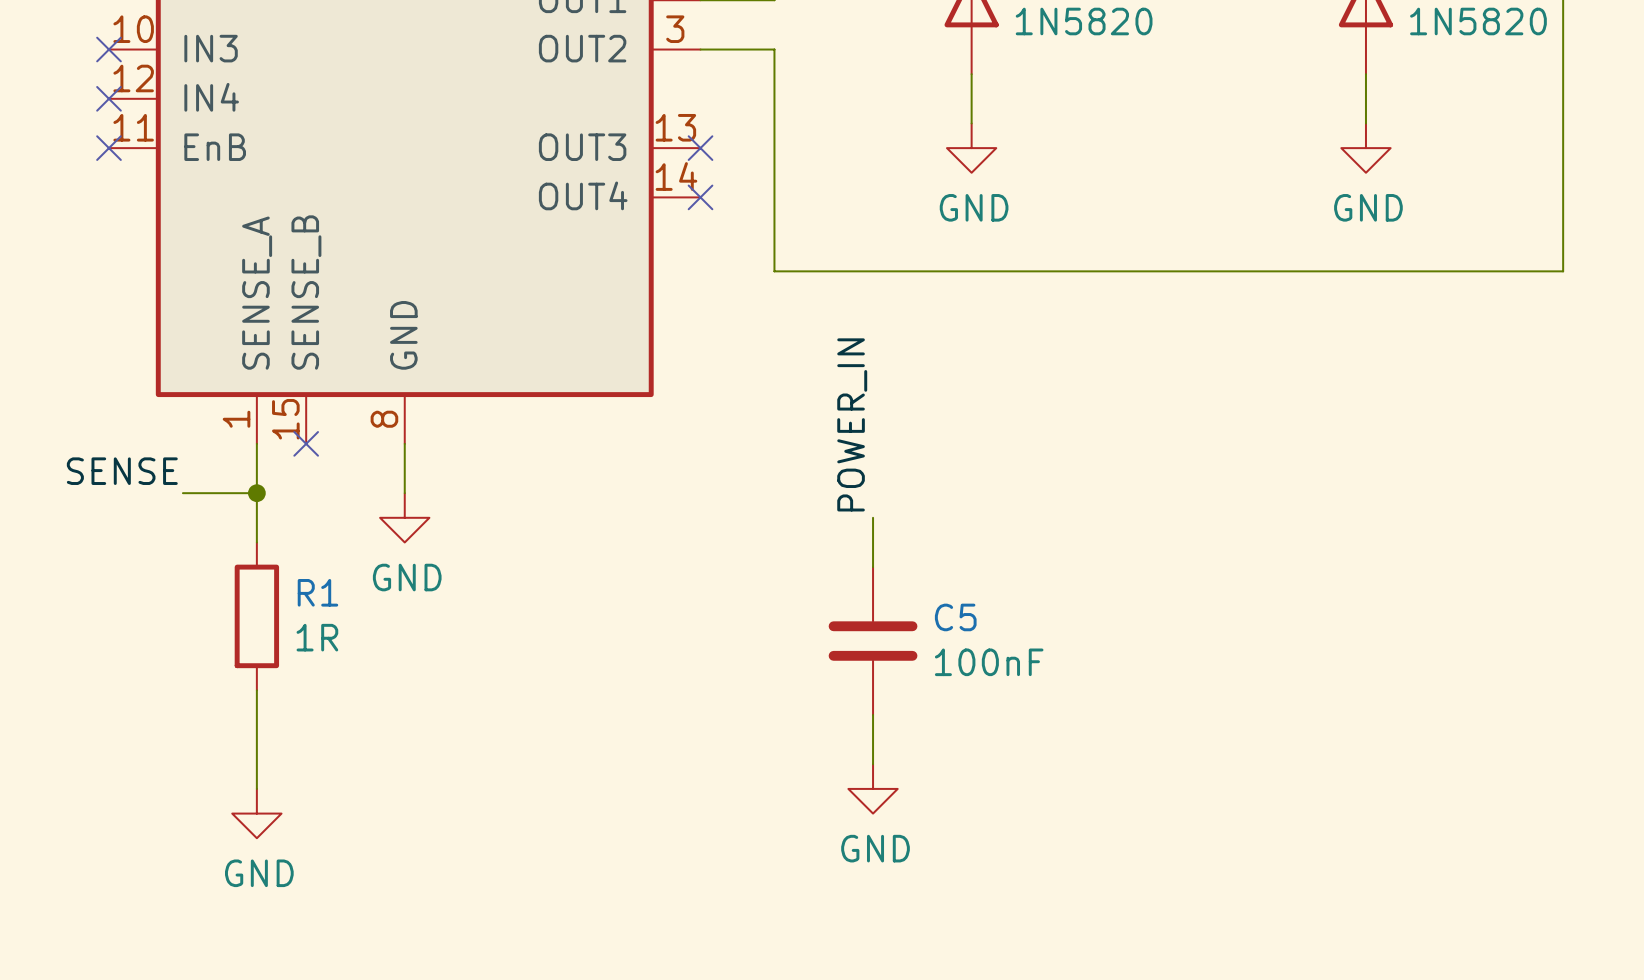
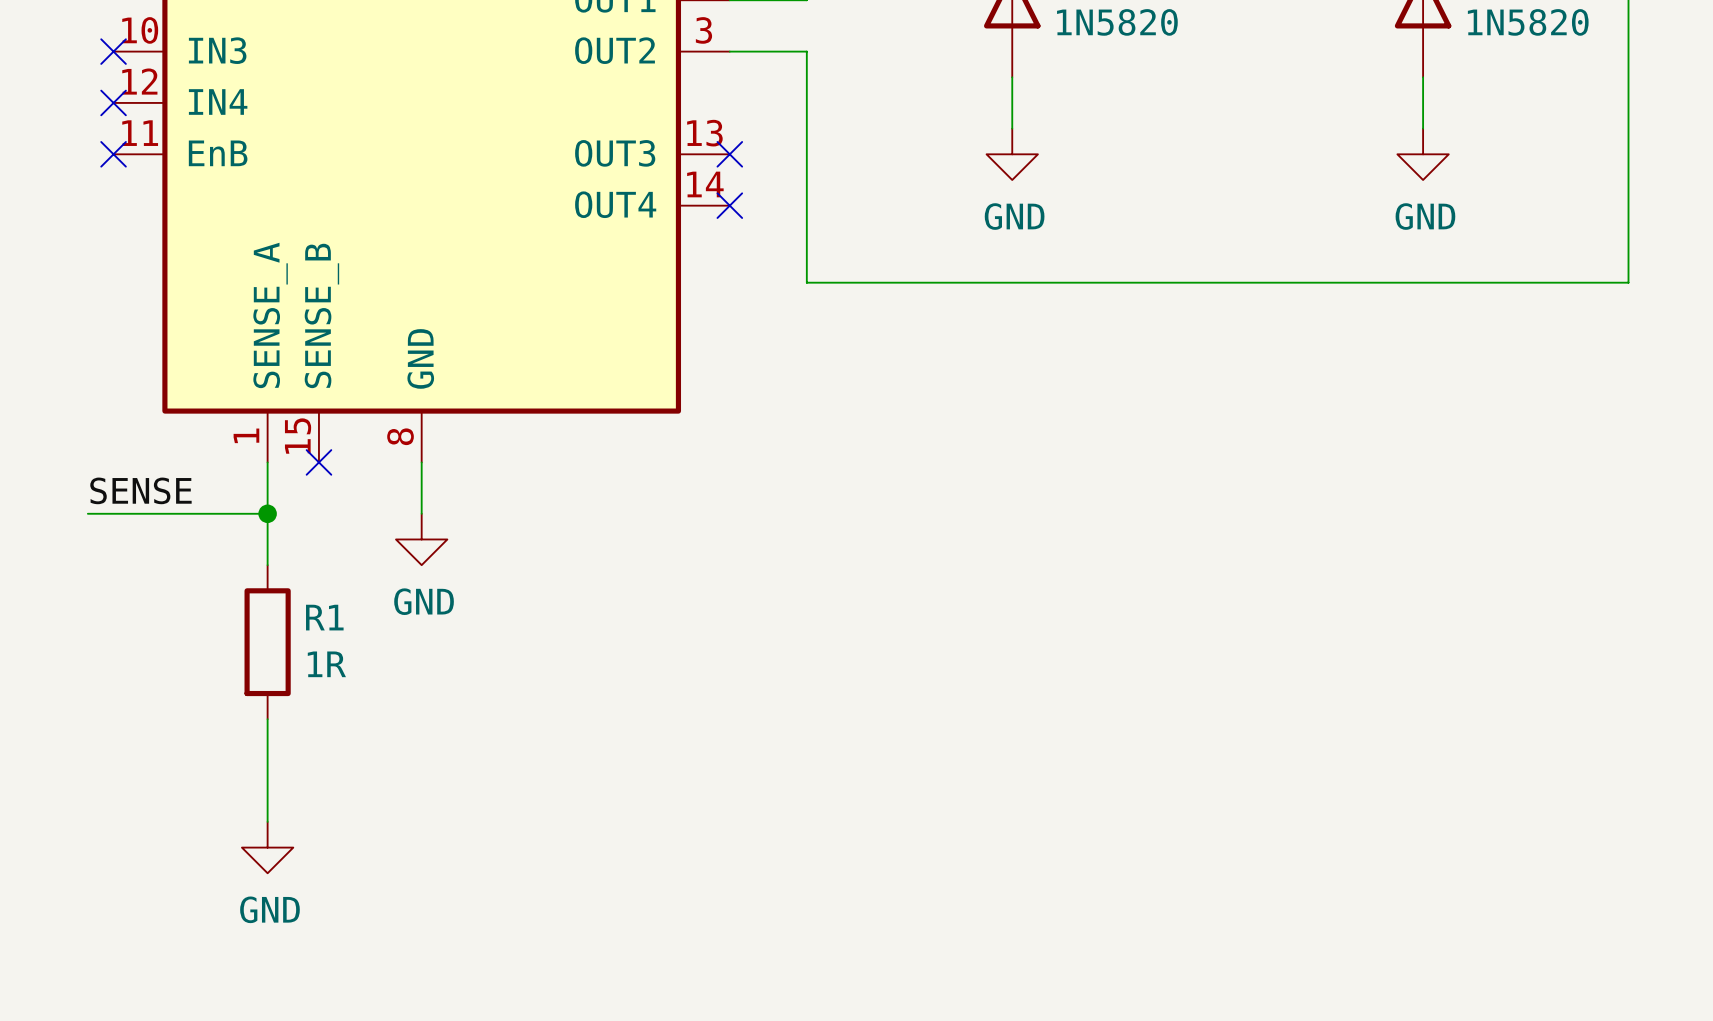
label: POWER_IN (852, 424) -> none
label position: SENSE (122, 471) -> SENSE (140, 490)
wire: none -> (87, 513) (190, 513)
wire: (873, 517) (873, 567) -> none
C5: 100nF (873, 641) -> none
wire: (873, 714) (873, 764) -> none
power symbol: GND (873, 788) -> none

